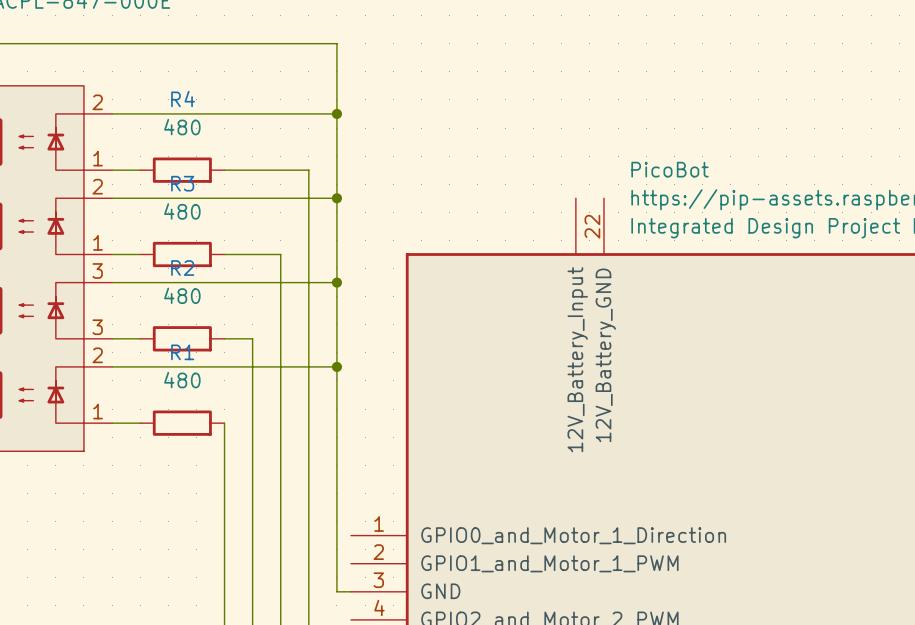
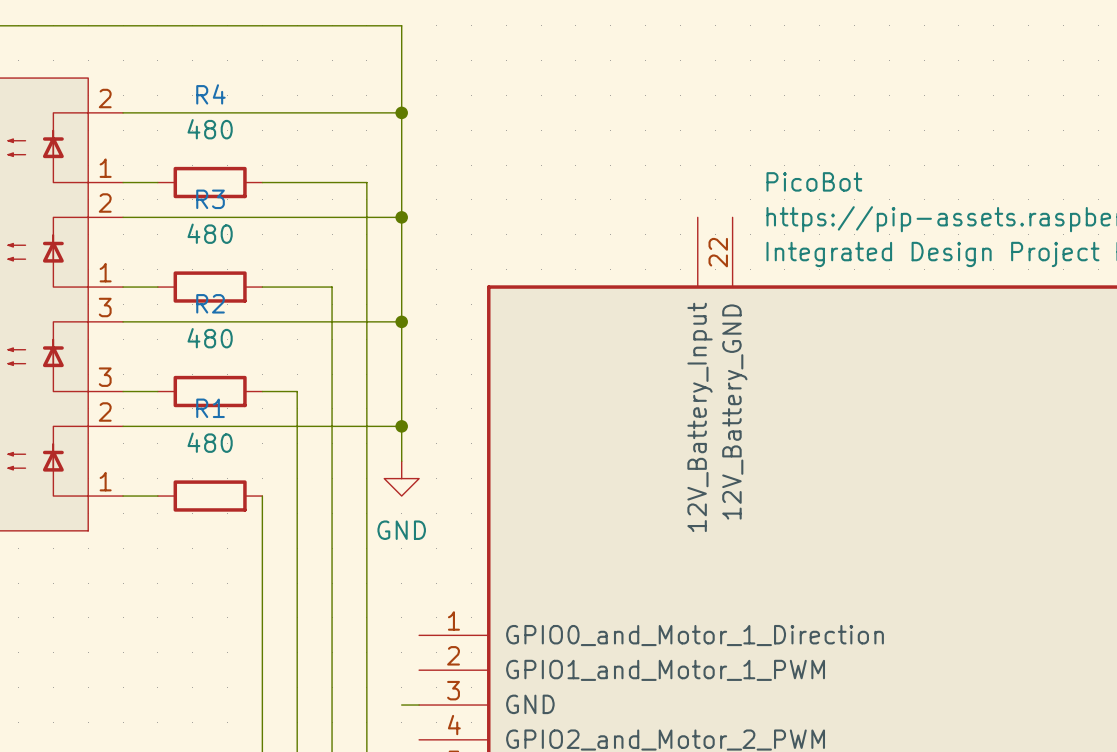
wire: (336, 395) (336, 591) -> none
power symbol: none -> GND (401, 478)

